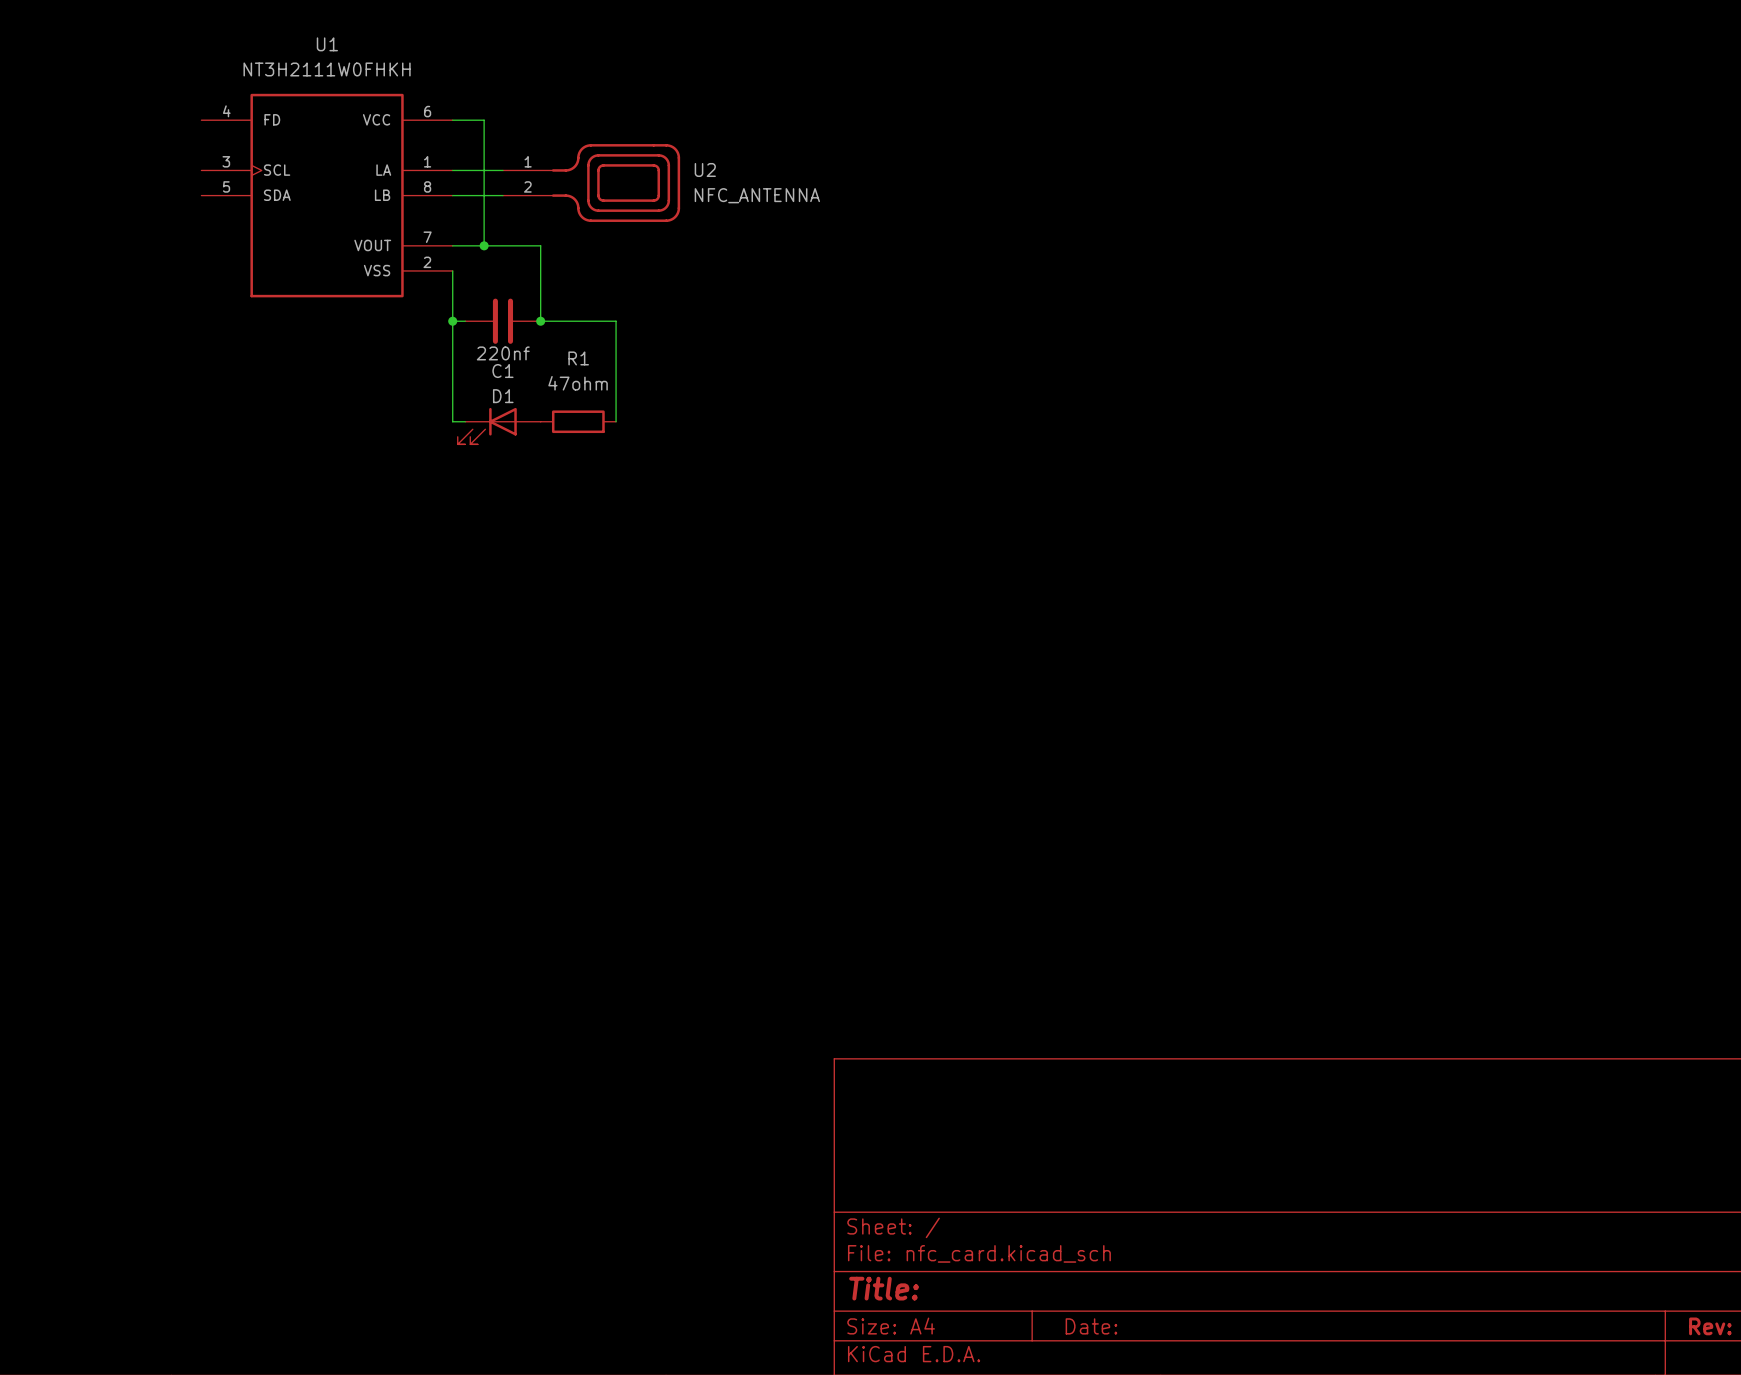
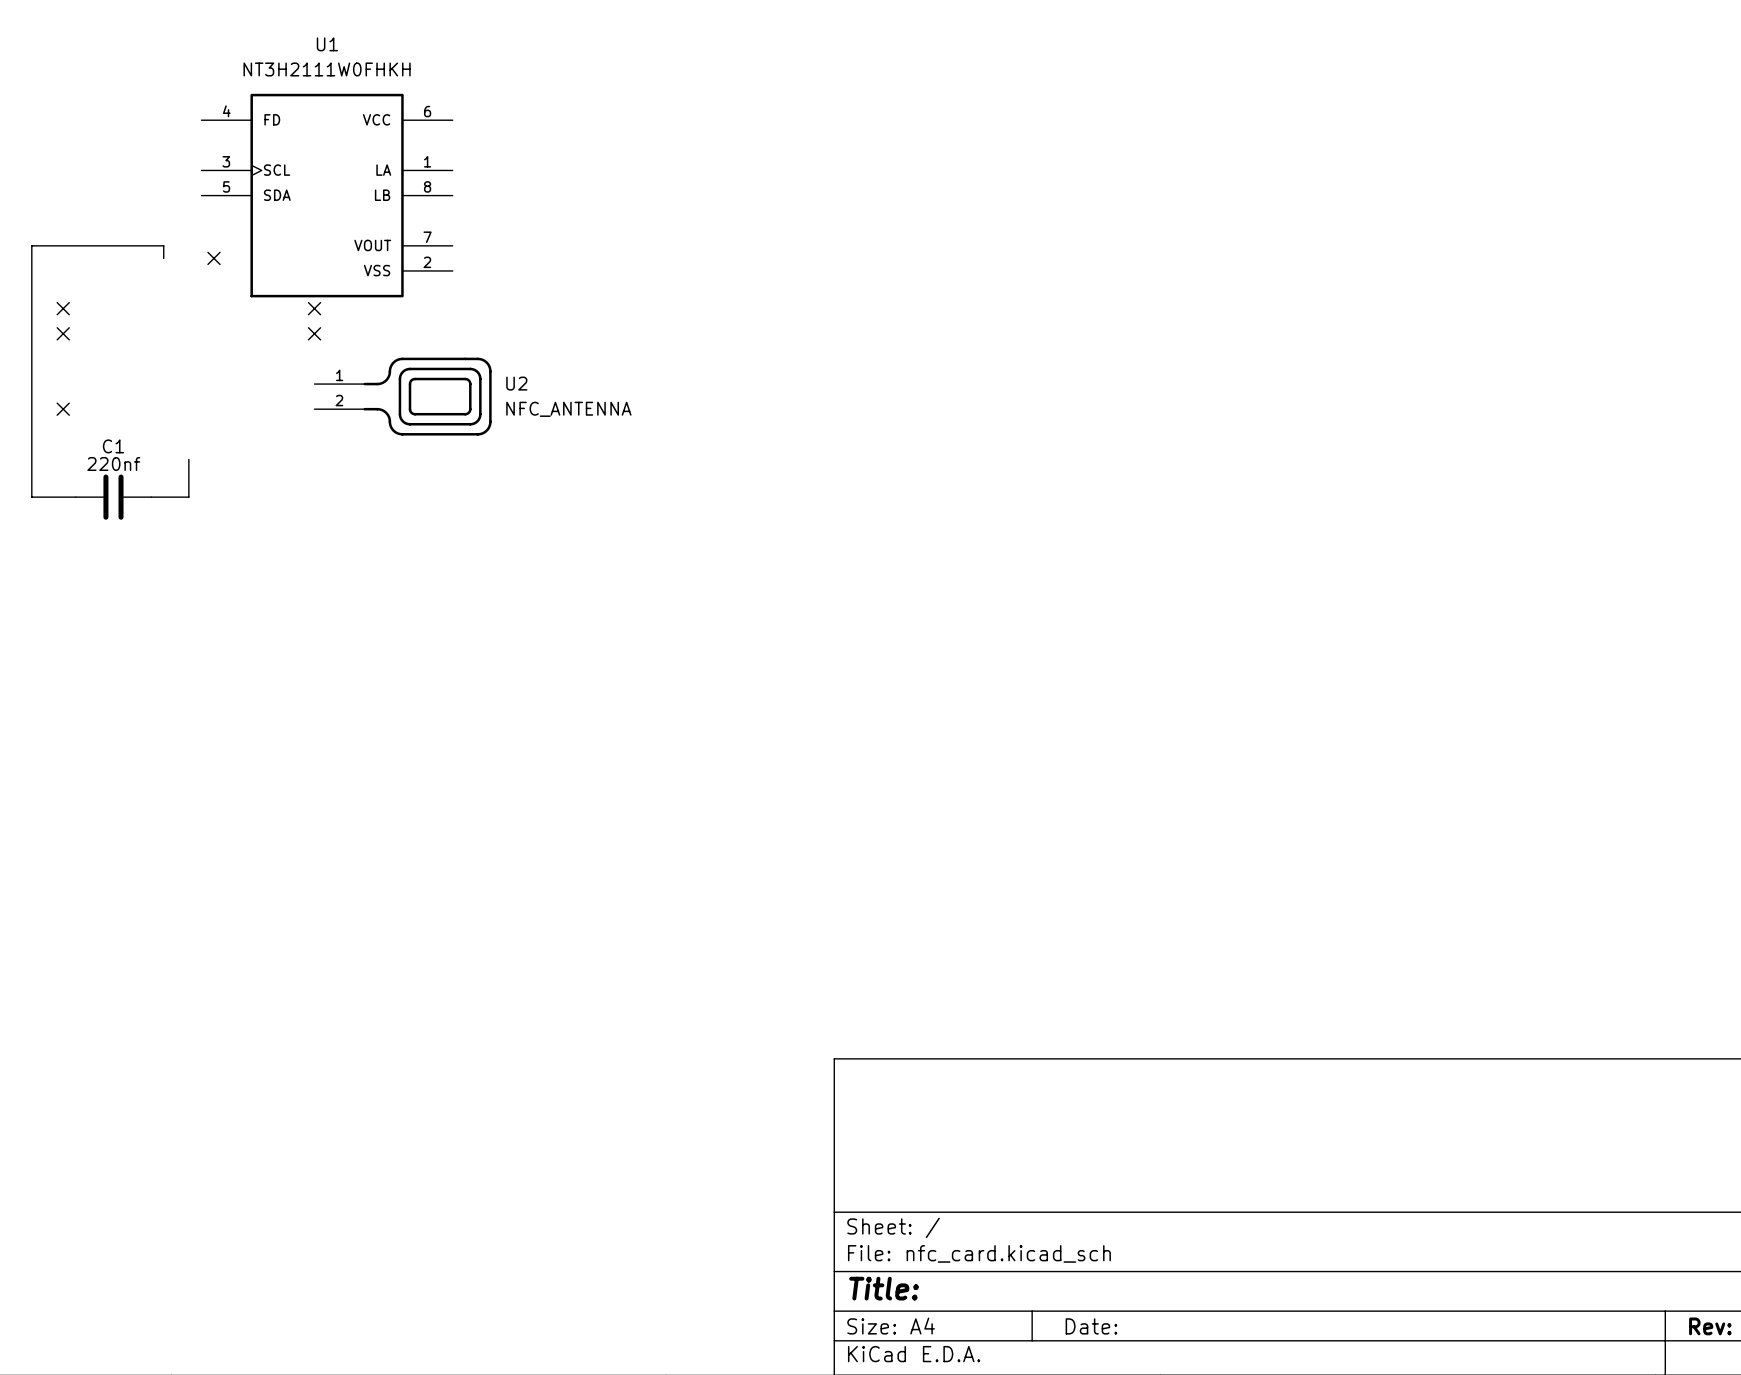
wire: (452, 120) (484, 120) (484, 245) -> none
wire: (452, 170) (502, 170) -> none
U2 position: (591, 183) -> (403, 396)
wire: (452, 195) (502, 195) -> none
wire: (452, 245) (540, 245) (540, 321) (616, 321) (616, 421) -> none
junction: (484, 245) -> none
wire: none -> (163, 258) (163, 245) (31, 245) (31, 497) (75, 497)
no-connect mark: none -> (213, 258)
wire: (452, 270) (452, 421) (465, 421) -> none
no-connect mark: none -> (63, 308)
no-connect mark: none -> (314, 308)
wire: (452, 321) (465, 321) -> none
junction: (452, 321) -> none
C1 position: (502, 321) -> (113, 497)
junction: (540, 321) -> none
no-connect mark: none -> (63, 333)
no-connect mark: none -> (314, 333)
C1 value position: 220nf (503, 353) -> 220nf (113, 463)
C1 name position: C1 (502, 371) -> C1 (113, 446)
no-connect mark: none -> (63, 409)
R1: 47ohm (578, 421) -> none
D1: (499, 426) -> none
wire: none -> (188, 459) (188, 497) (151, 497)

